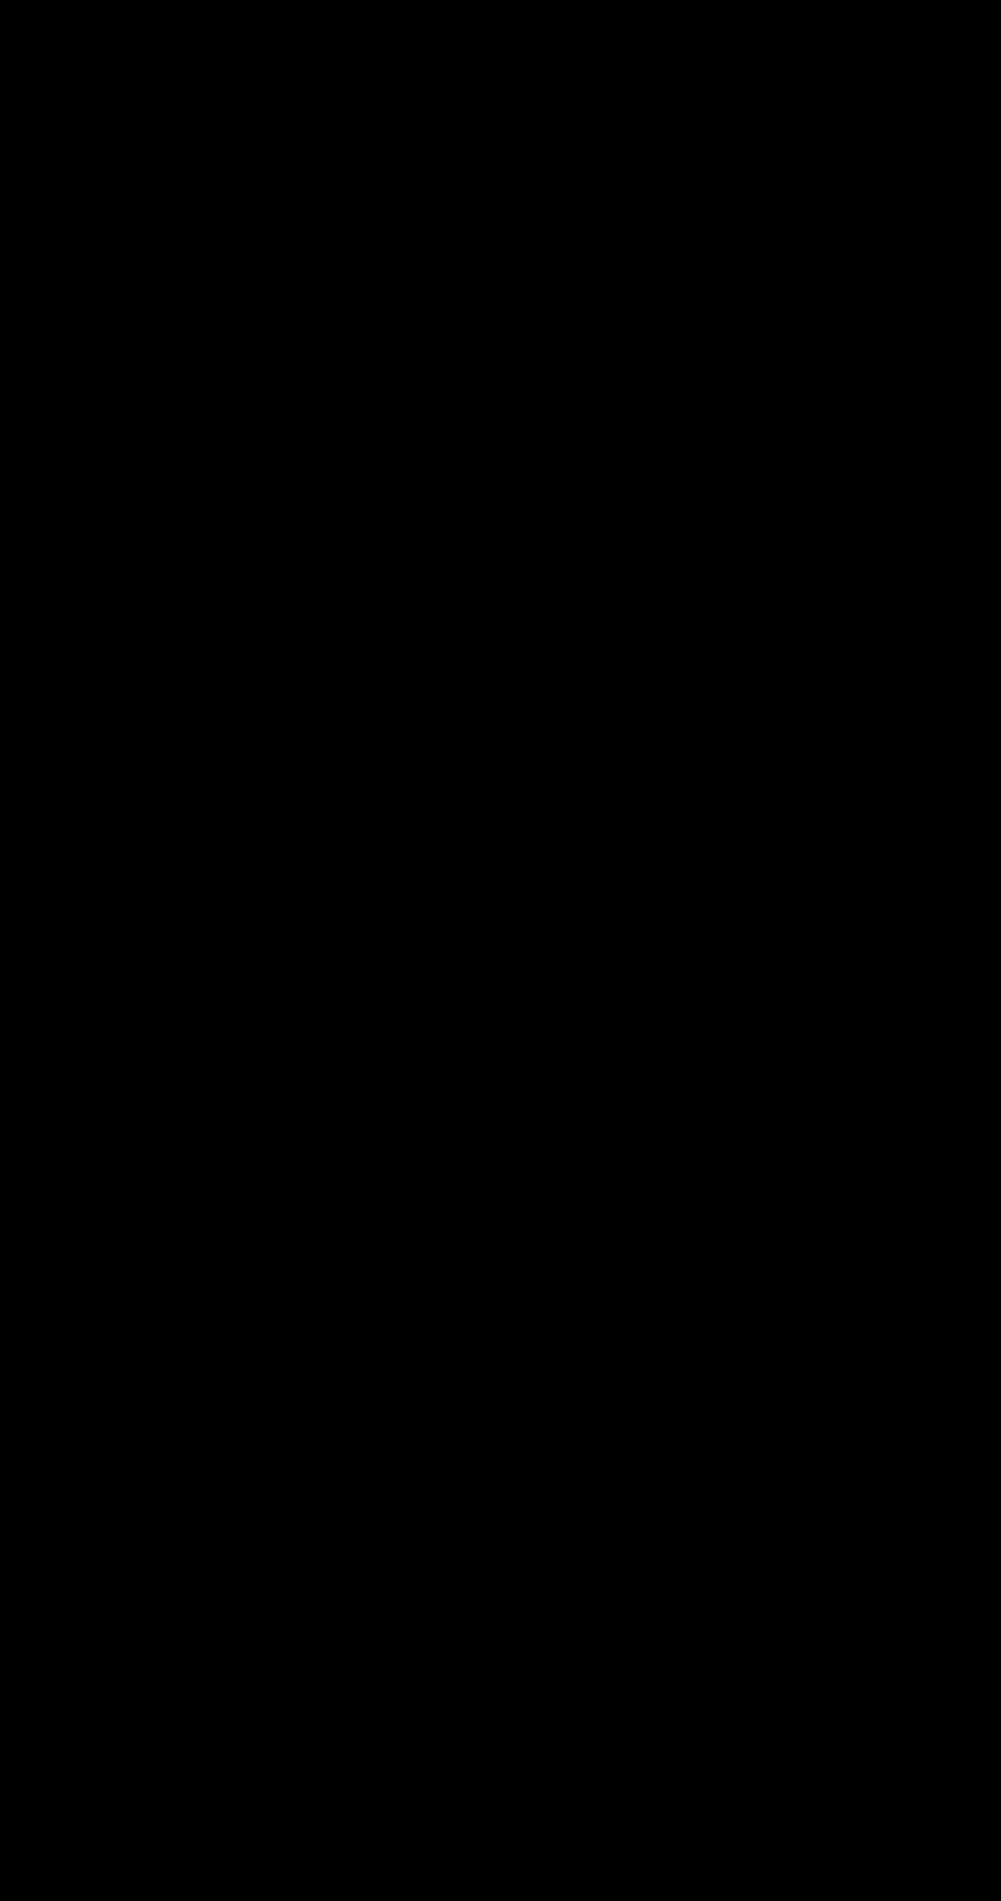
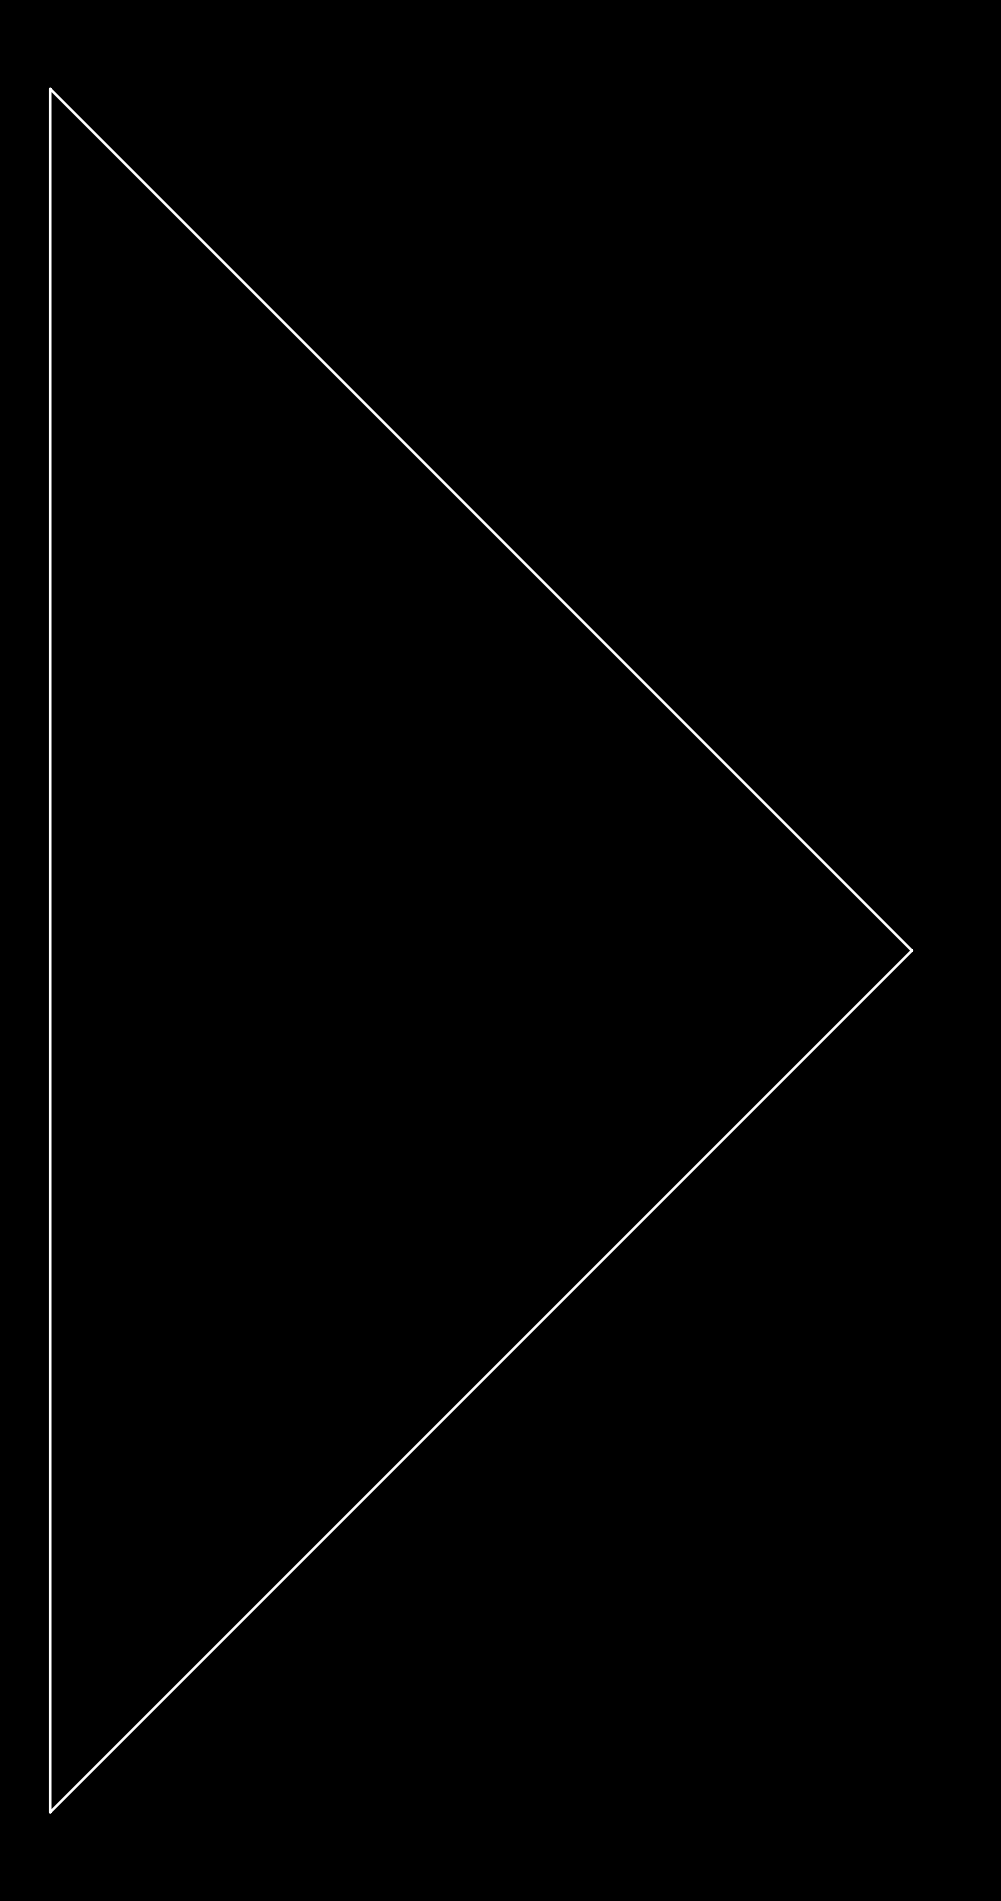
board edge: none -> (50, 88) (911, 950) (50, 1812) (50, 88)

